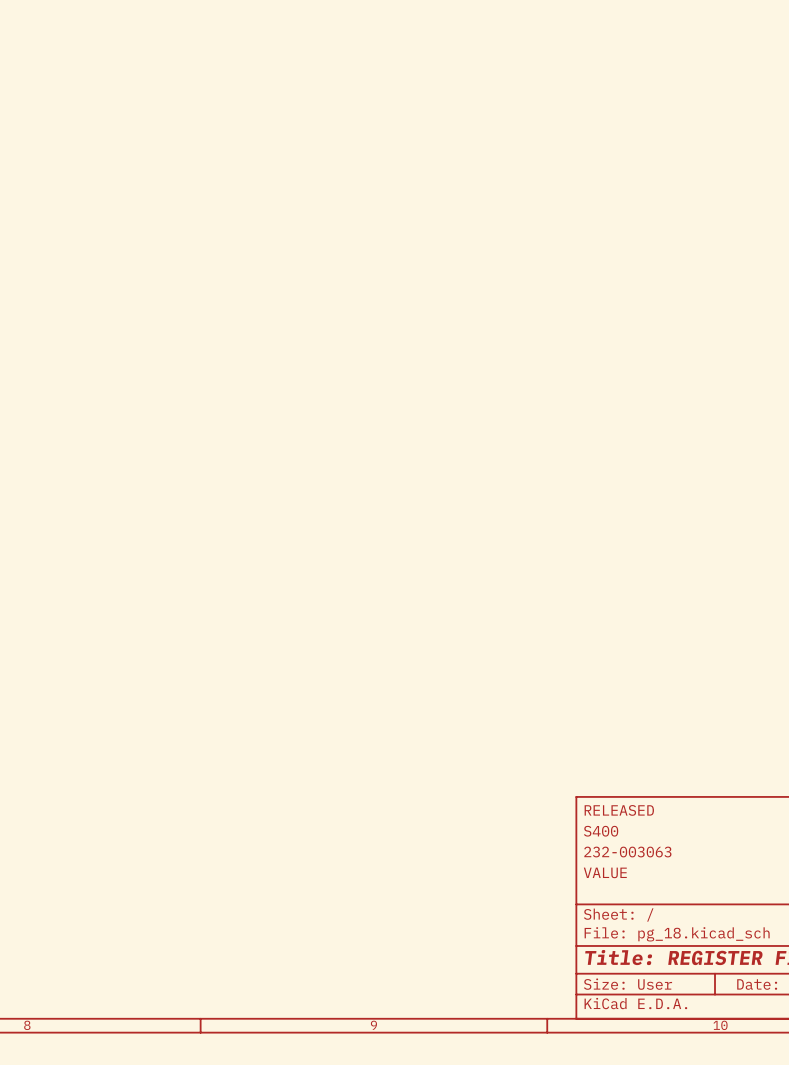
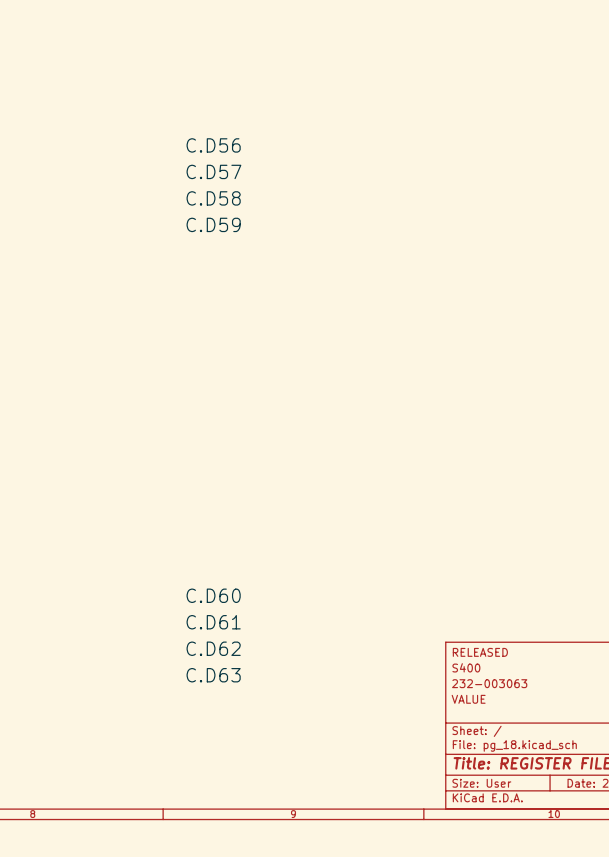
label: none -> C.D56 (213, 145)
label: none -> C.D57 (213, 171)
label: none -> C.D58 (213, 198)
label: none -> C.D59 (213, 224)
label: none -> C.D60 (213, 595)
label: none -> C.D61 (213, 622)
label: none -> C.D62 (213, 648)
label: none -> C.D63 (213, 675)

